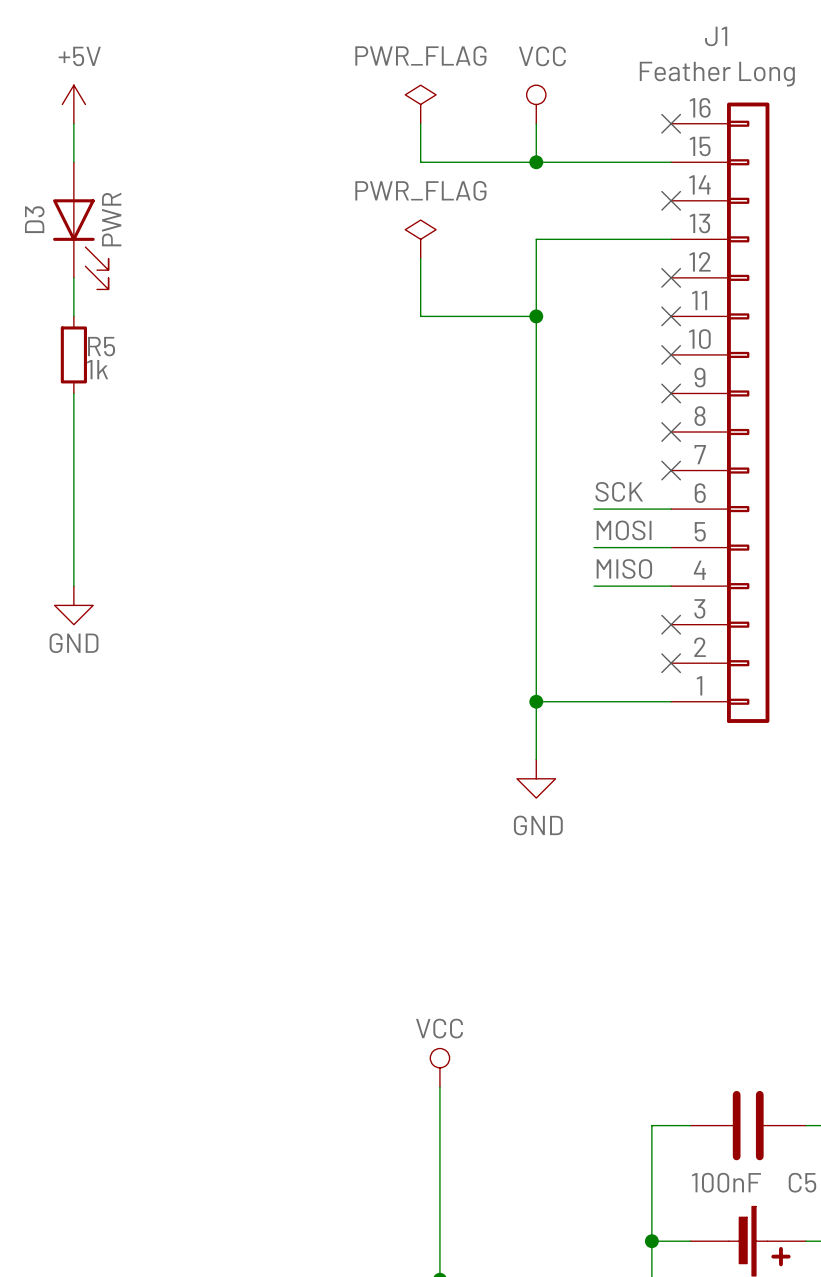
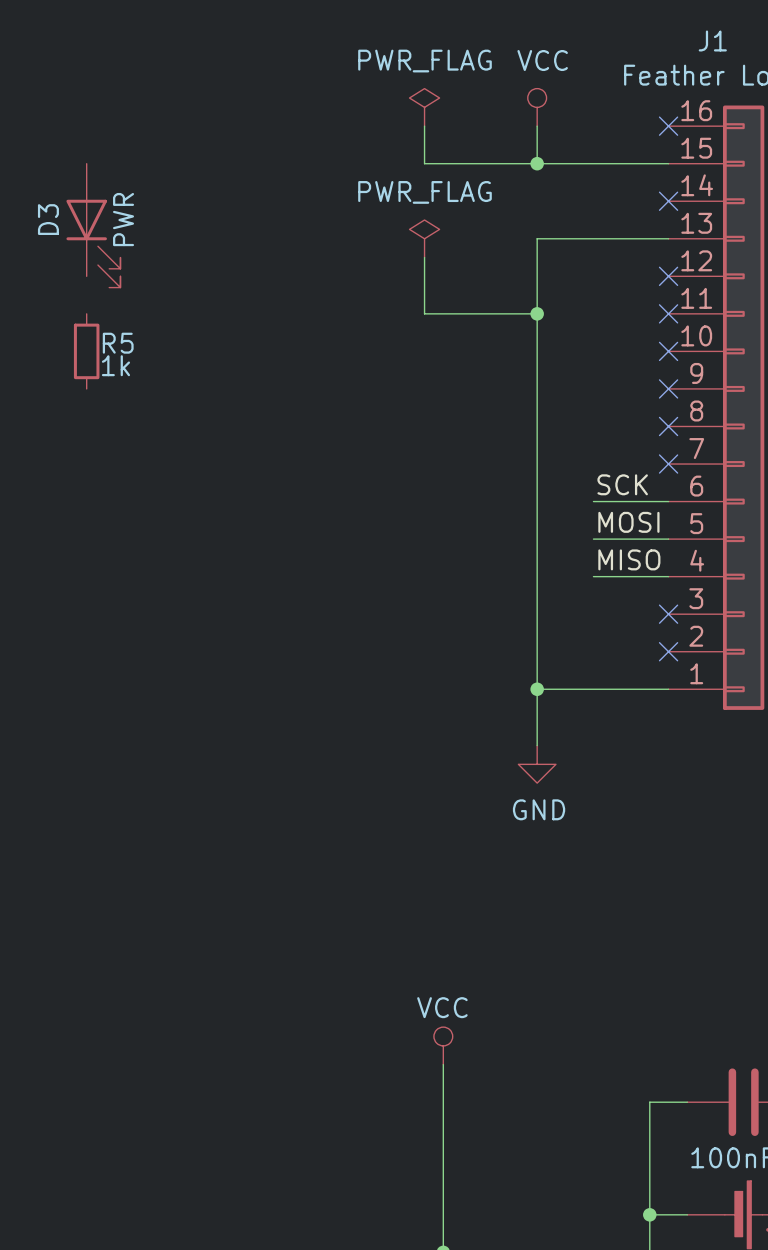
power symbol: +5V (73, 104) -> none
wire: (73, 123) (73, 162) -> none
wire: (73, 277) (73, 316) -> none
wire: (73, 393) (73, 586) -> none
power symbol: GND (73, 605) -> none

